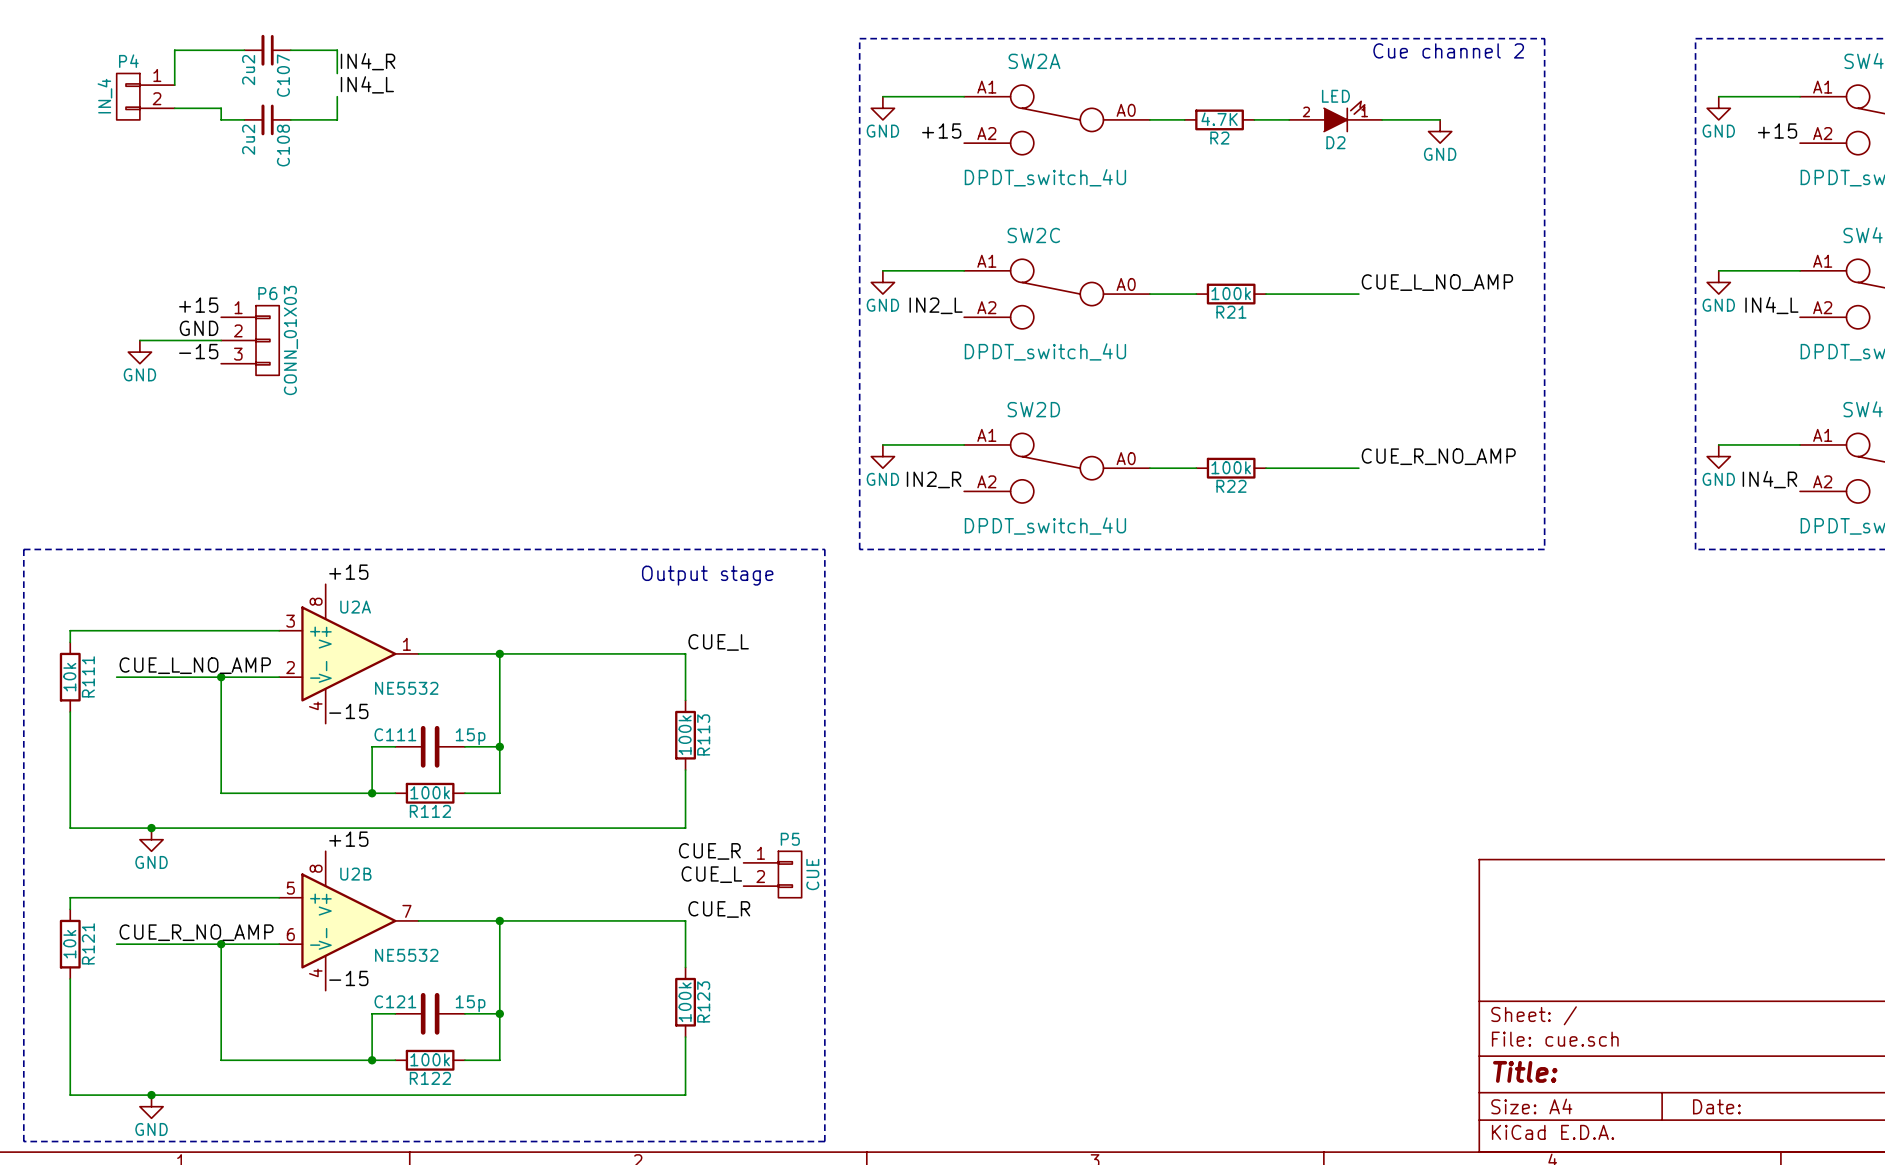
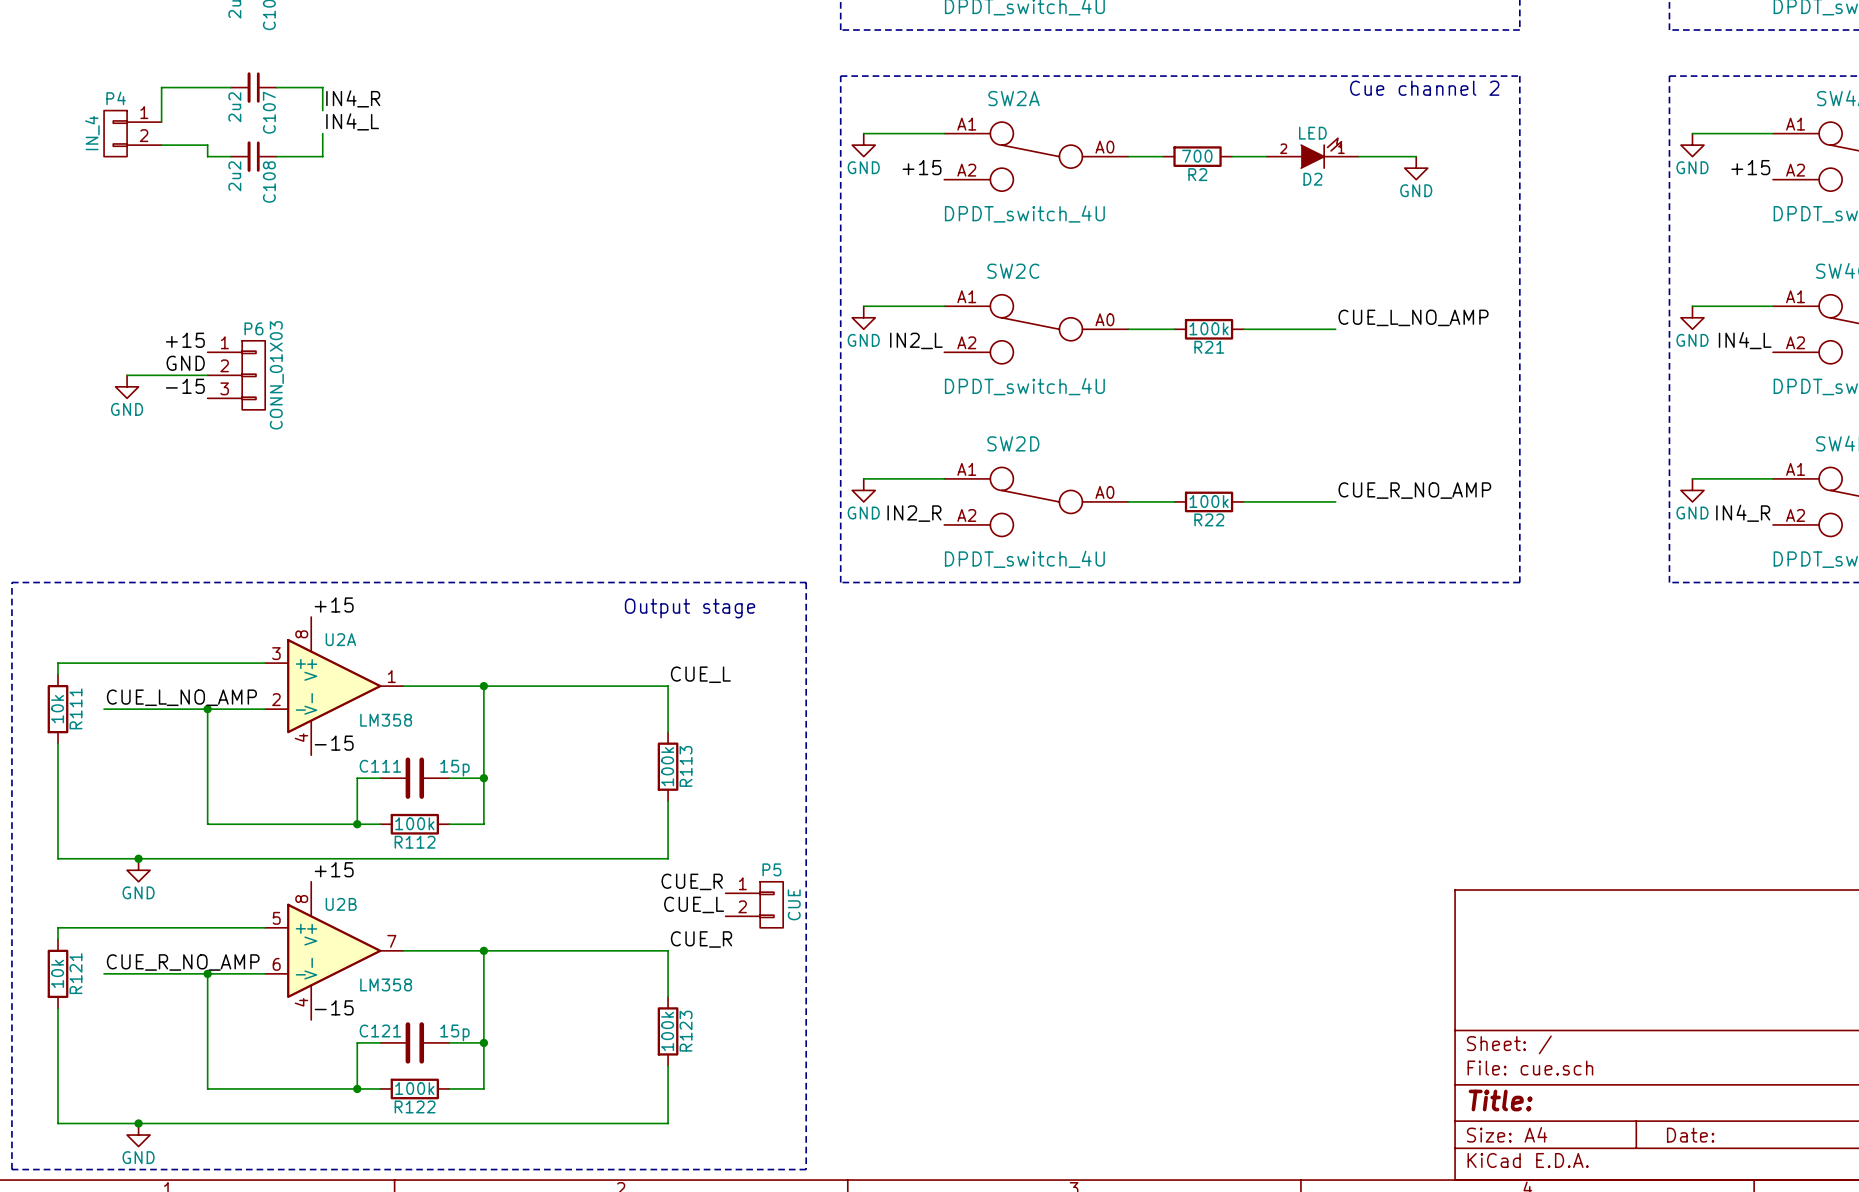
R2 value: 4.7K (1219, 119) -> 700 (1197, 156)
U2A value: NE5532 (406, 688) -> LM358 (386, 720)
U2B value: NE5532 (406, 955) -> LM358 (386, 984)

